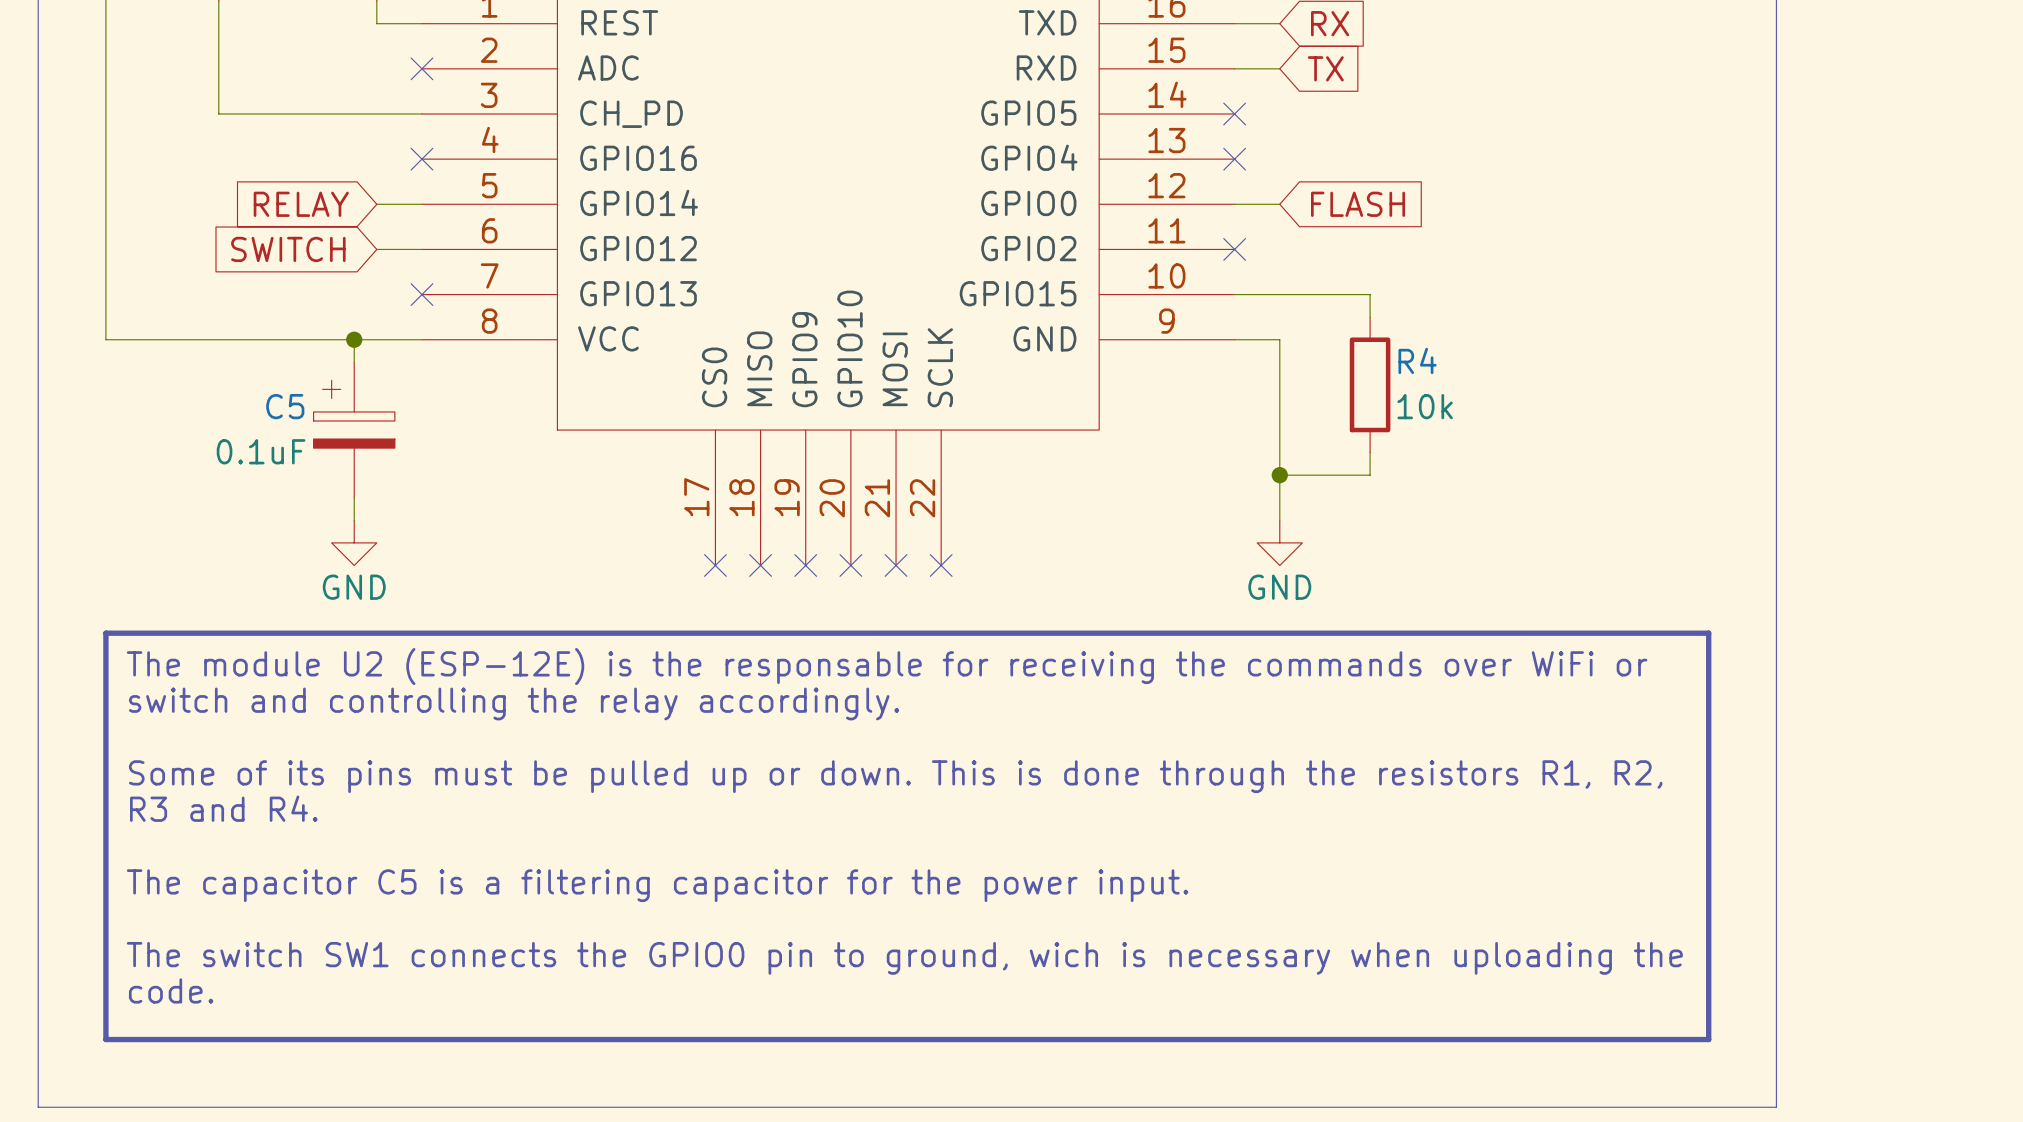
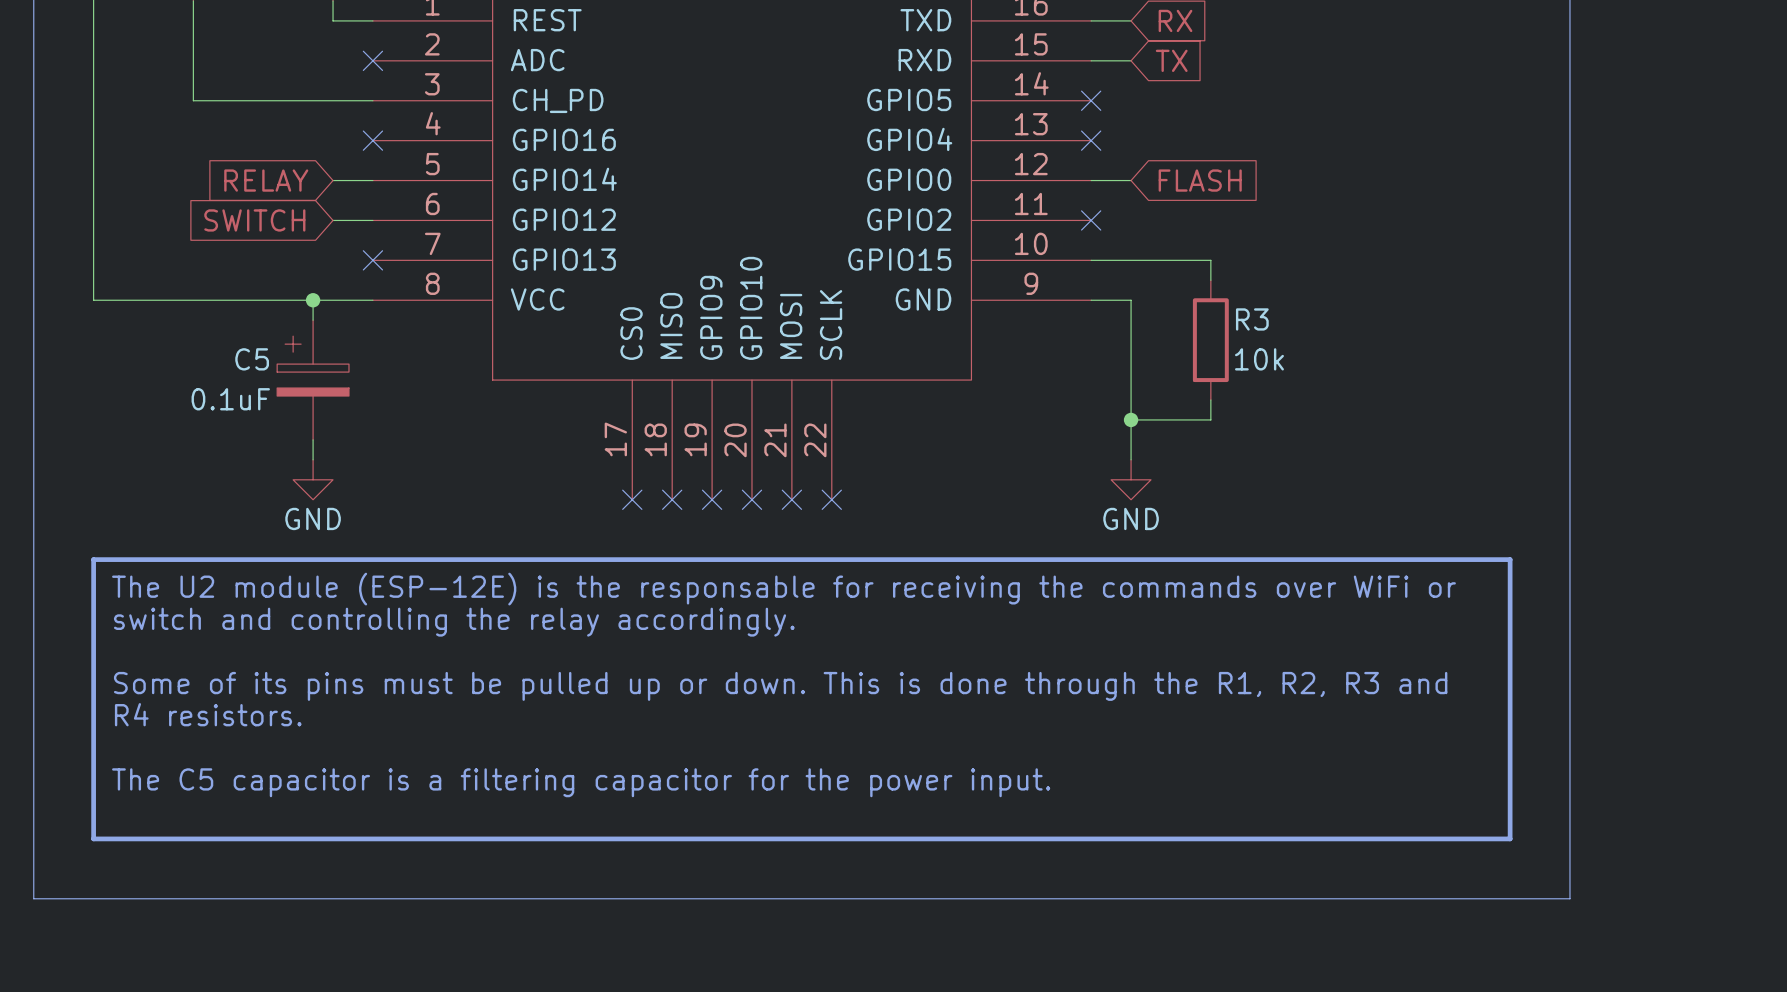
R4 name: R4 (1417, 360) -> R3 (1252, 319)
text: The module U2 (ESP-12E) is the responsable for receiving the commands over WiFi or (887, 666) -> The U2 module (ESP-12E) is the responsable for receiving the commands over WiFi or (783, 589)
text: Some of its pins must be pulled up or down. This is done through the resistors R1, R2, (895, 776) -> Some of its pins must be pulled up or down. This is done through the R1, R2, R3 and (780, 686)
text: R3 and R4. (223, 808) -> R4 resistors. (208, 714)
text: The capacitor C5 is a filtering capacitor for the power input. (657, 885) -> The C5 capacitor is a filtering capacitor for the power input. (581, 782)
line: (105, 949) (105, 1039) (1708, 1039) (1708, 949) -> (93, 838) (1510, 838)
text: The switch SW1 connects the GPIO0 pin to ground, wich is necessary when uploading the (904, 958) -> none
text: code. (171, 990) -> none
line: (38, 1016) (38, 1107) (1776, 1107) (1776, 1016) -> (33, 898) (1569, 898)

